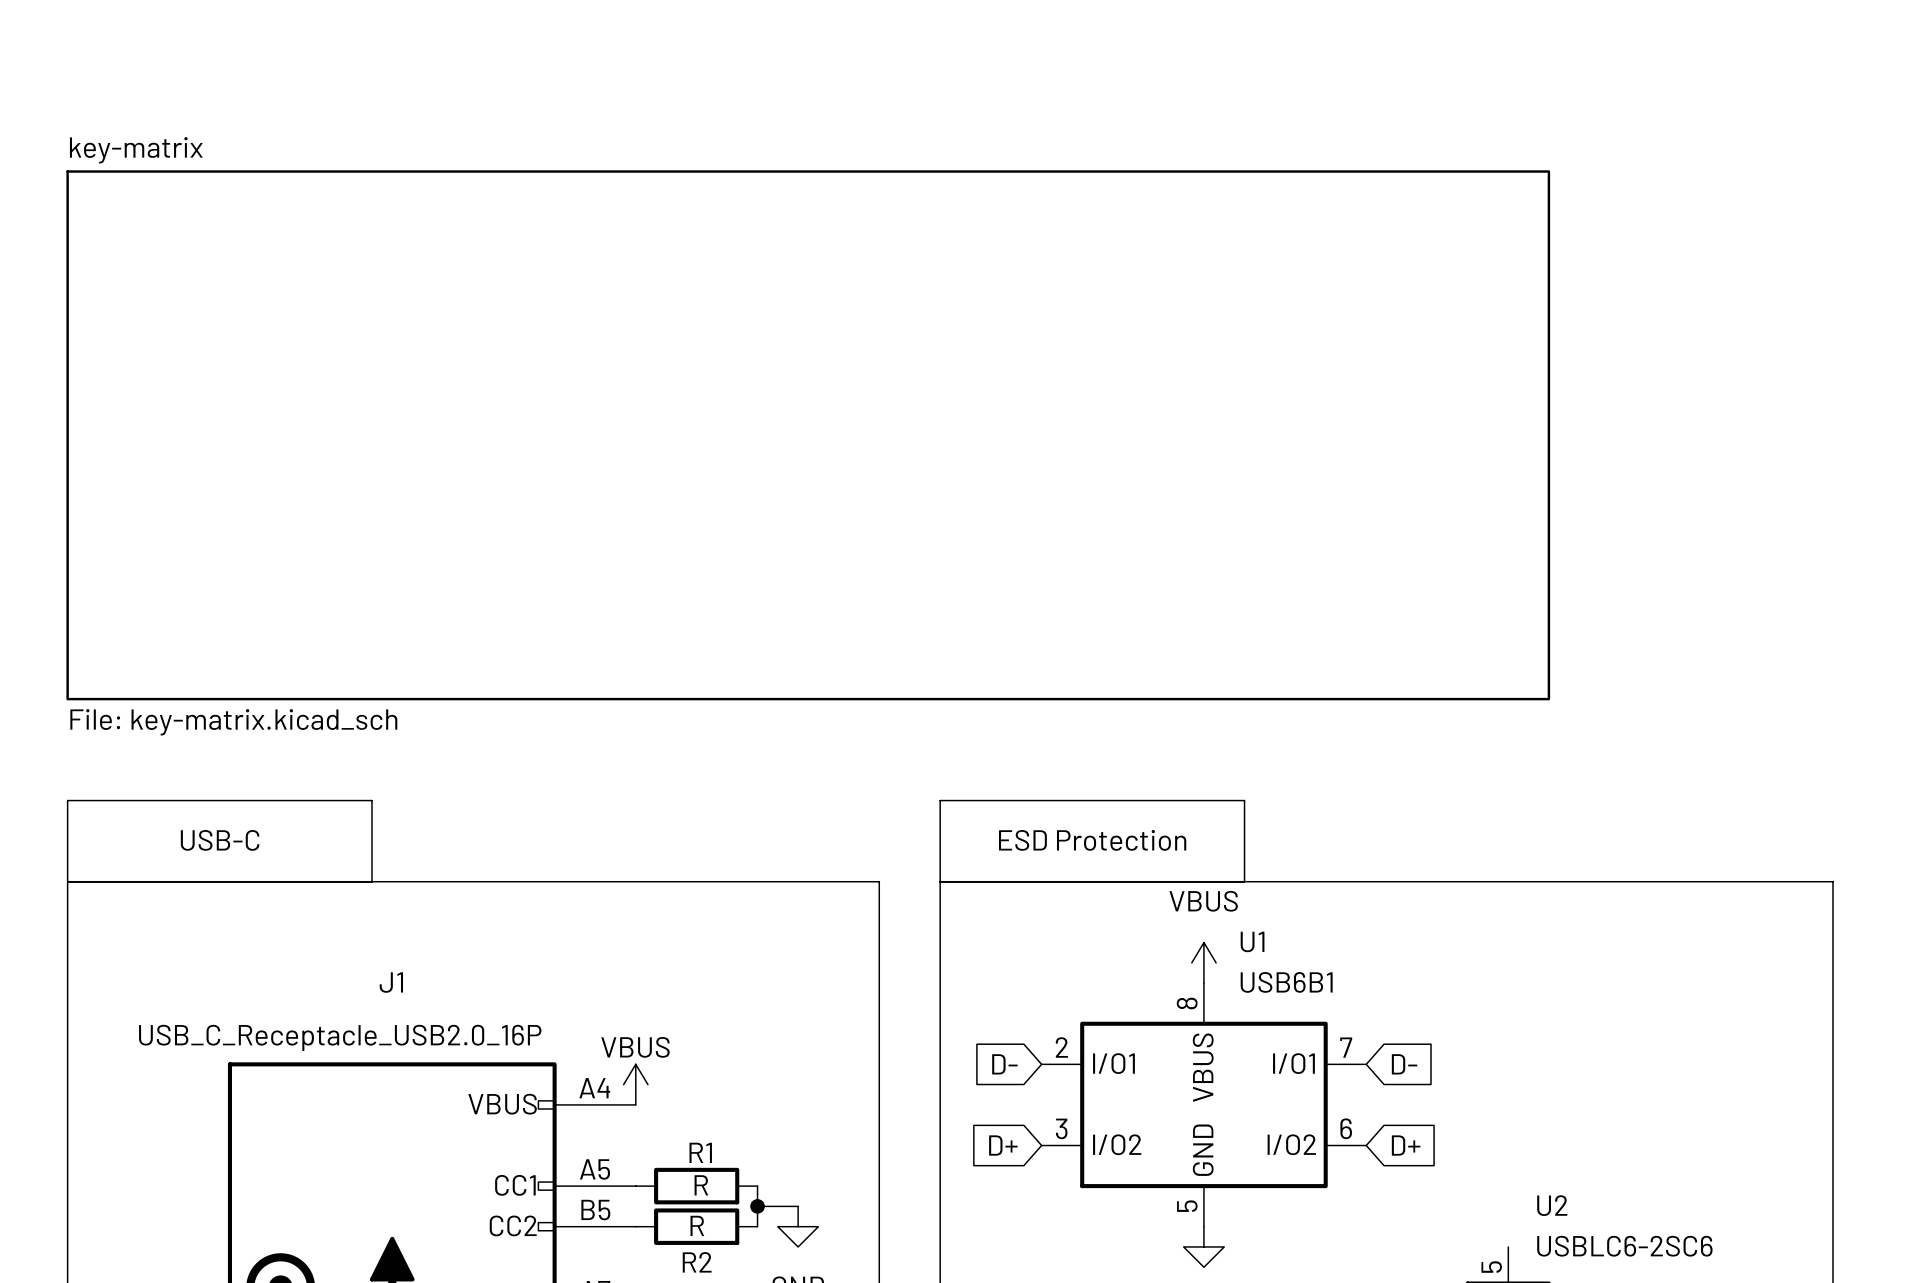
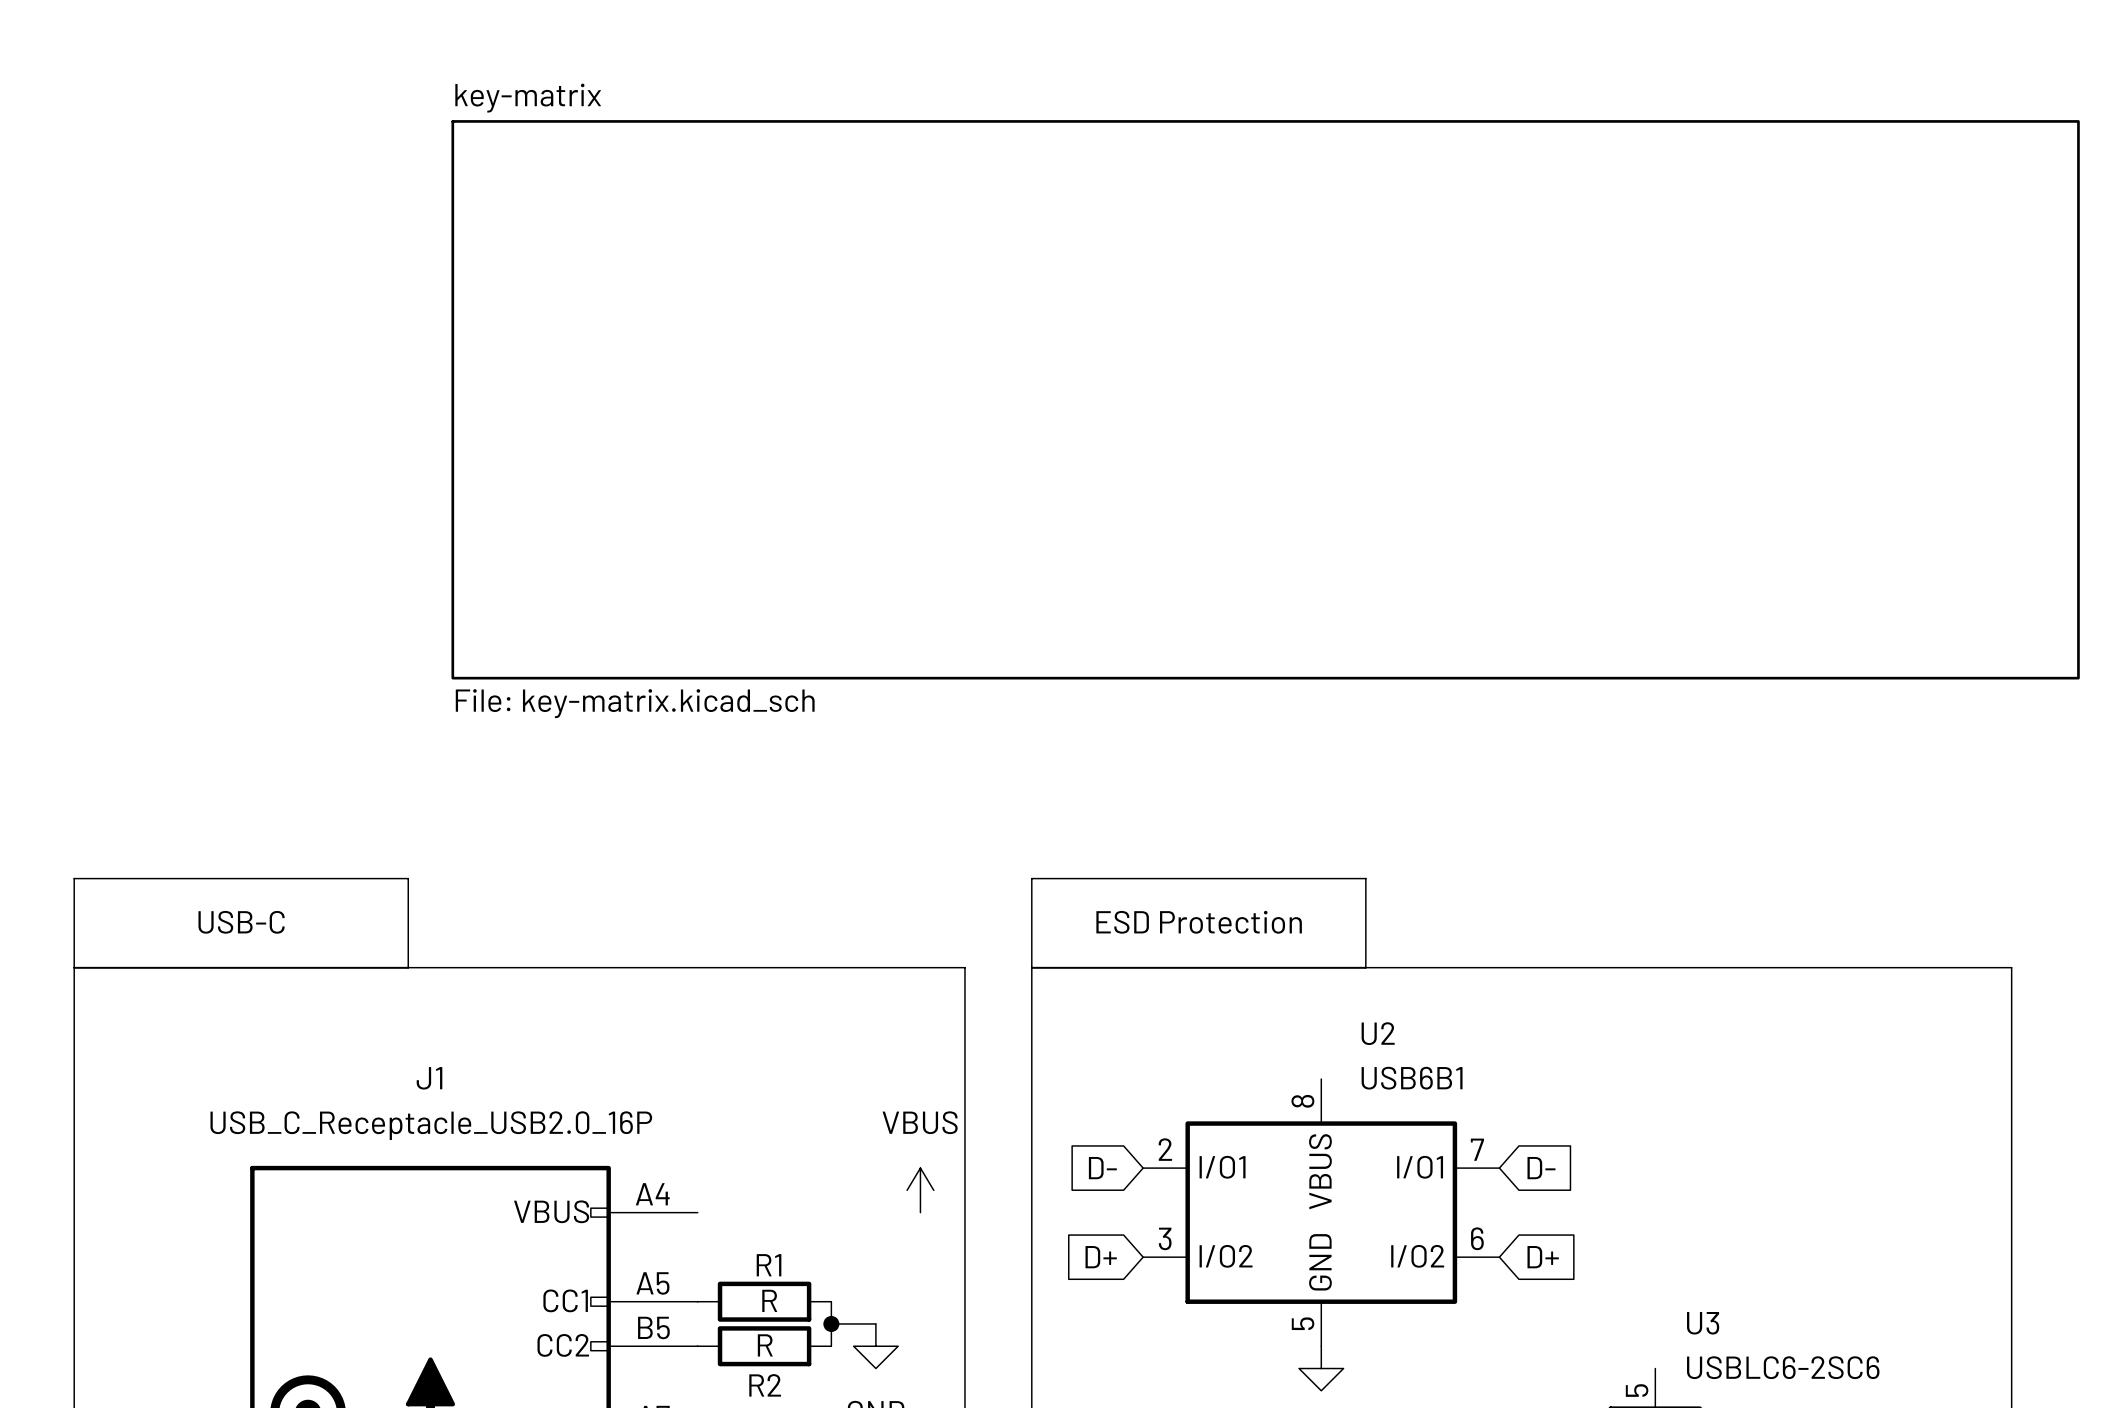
sheet key-matrix: none -> File: key-matrix.kicad_sch (1265, 399)
sheet key-matrix: File: key-matrix.kicad_sch (808, 435) -> none
U1 name: U1 (1252, 941) -> U2 (1378, 1033)
power symbol: VBUS (1203, 962) -> none
J1 value position: USB_C_Receptacle_USB2.0_16P (340, 1037) -> USB_C_Receptacle_USB2.0_16P (431, 1125)
power symbol: VBUS (635, 1084) -> none
power symbol: none -> VBUS (920, 1190)
U2 name: U2 (1552, 1205) -> U3 (1703, 1323)

